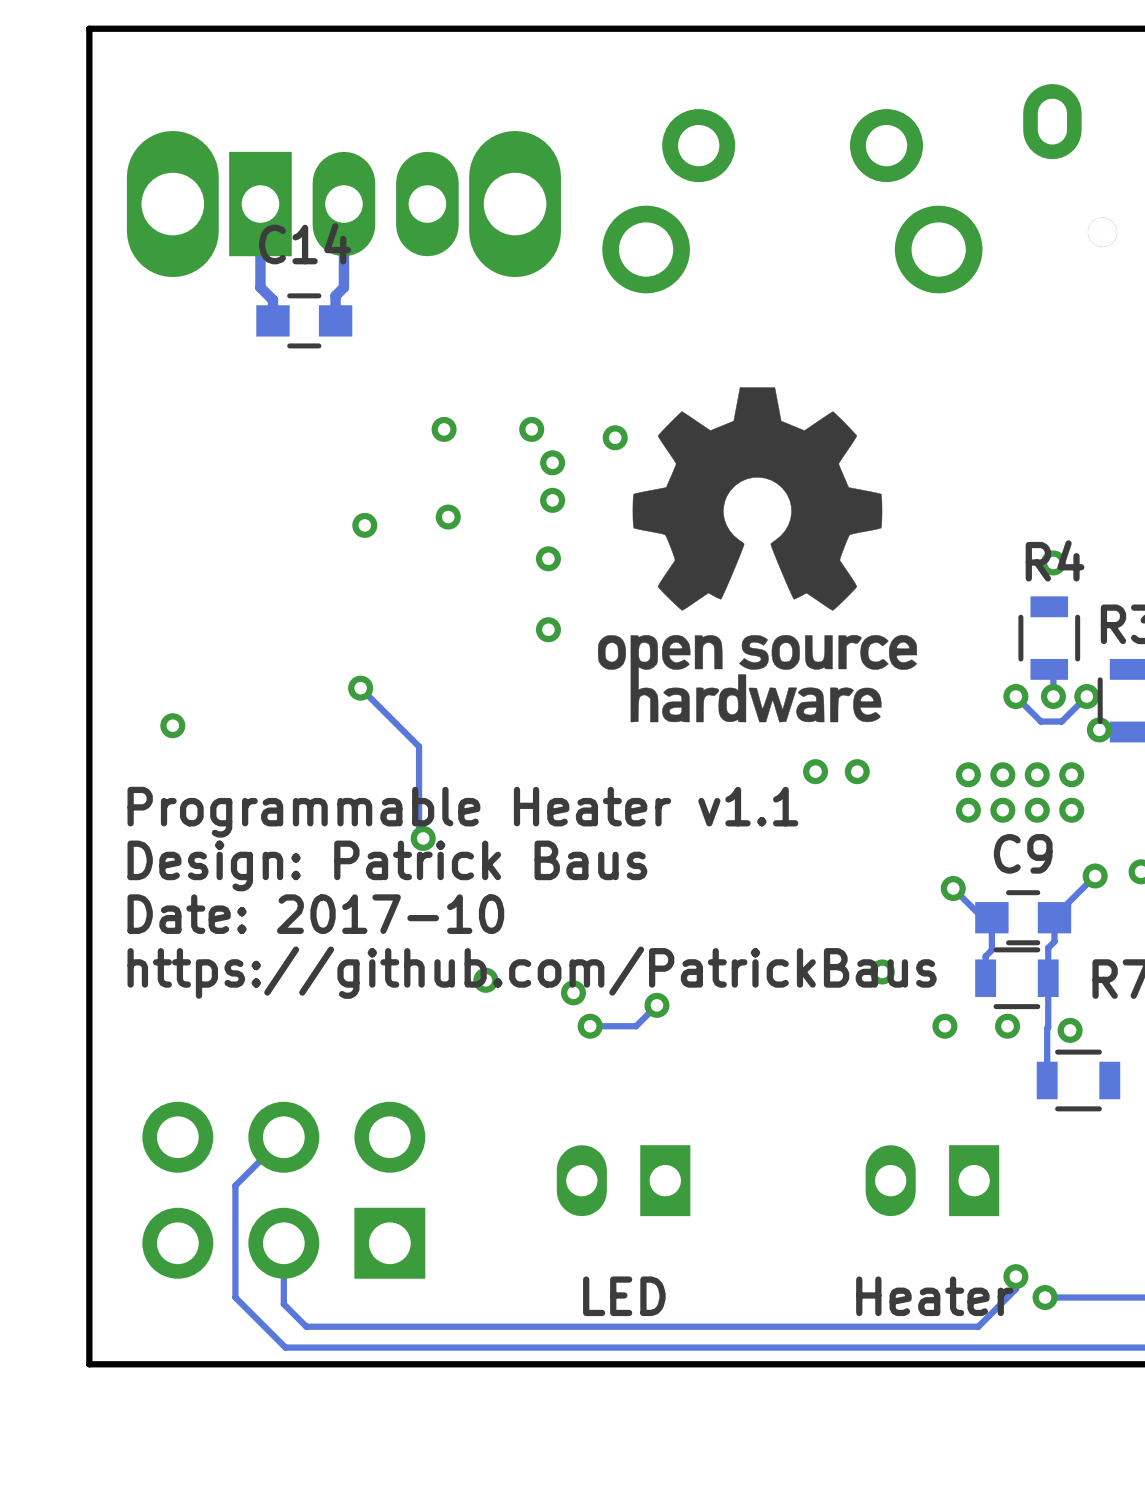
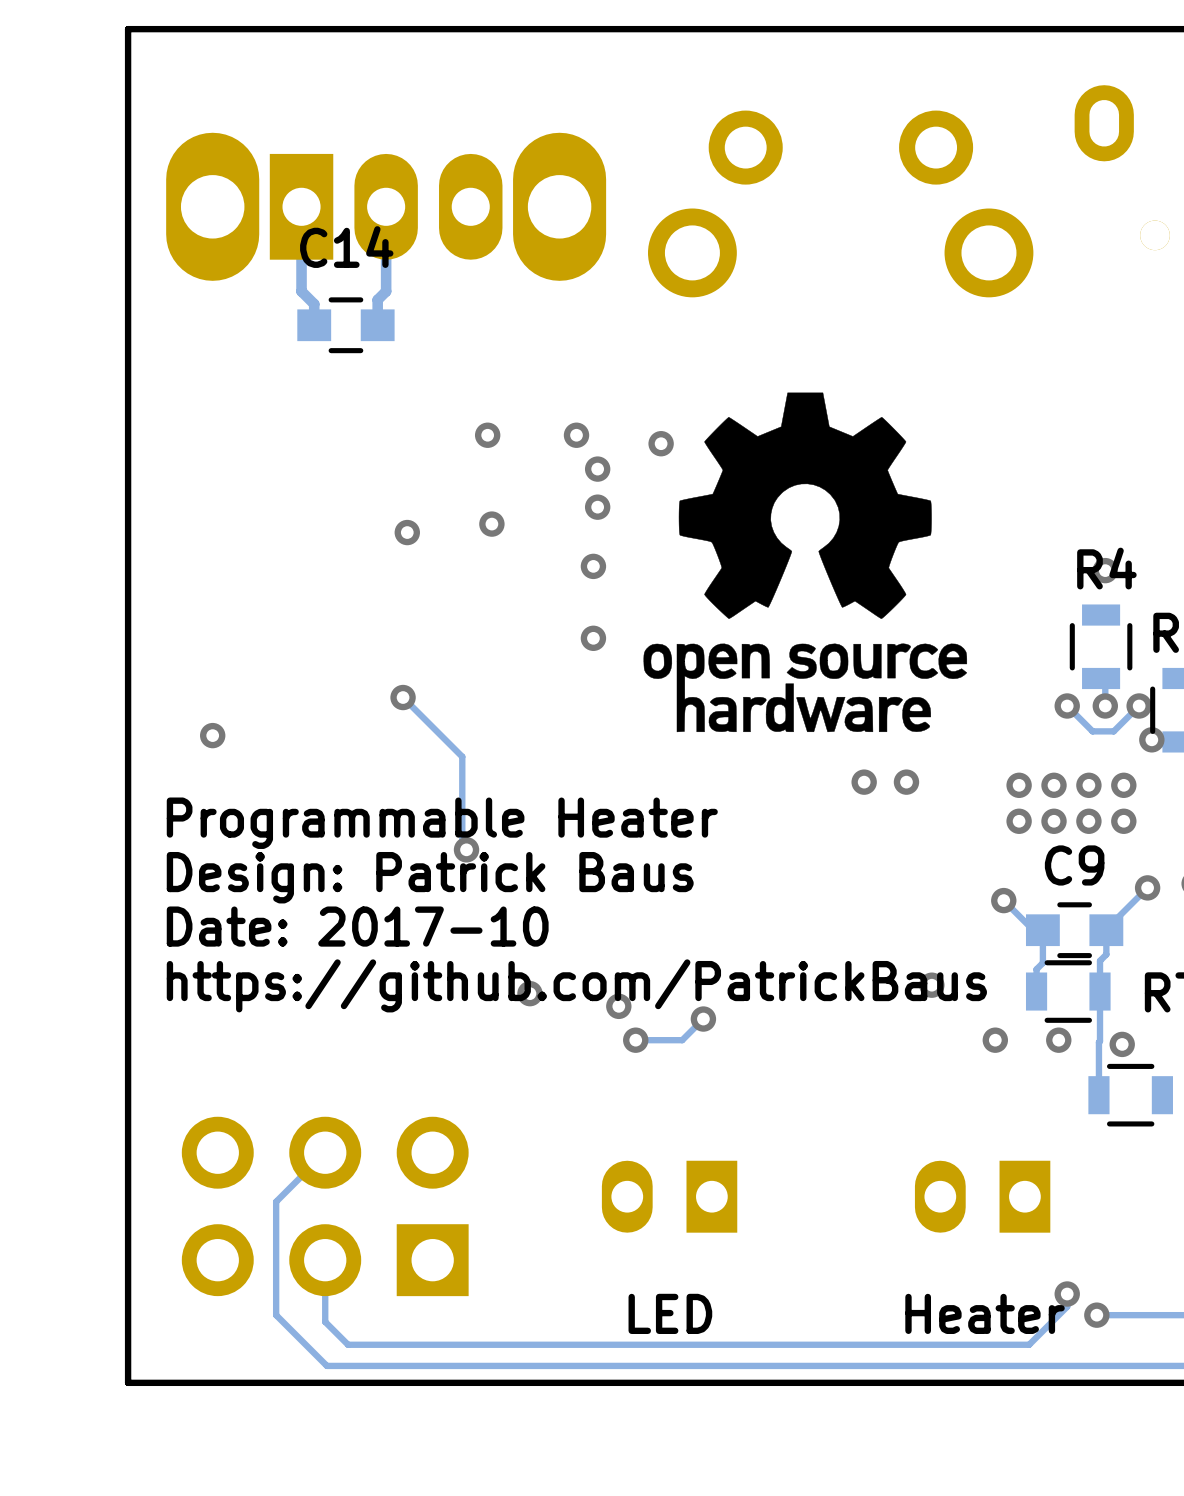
text: Programmable Heater v1.1 (462, 812) -> Programmable Heater (442, 823)

